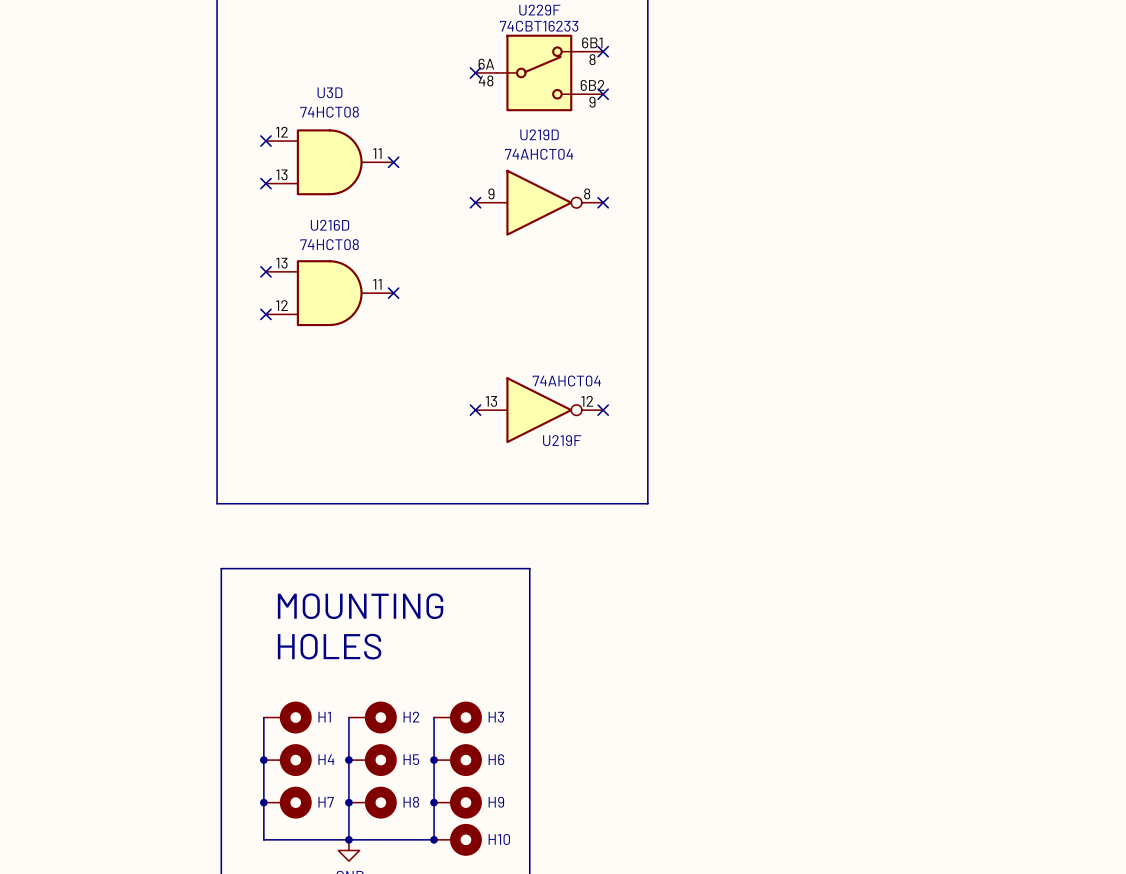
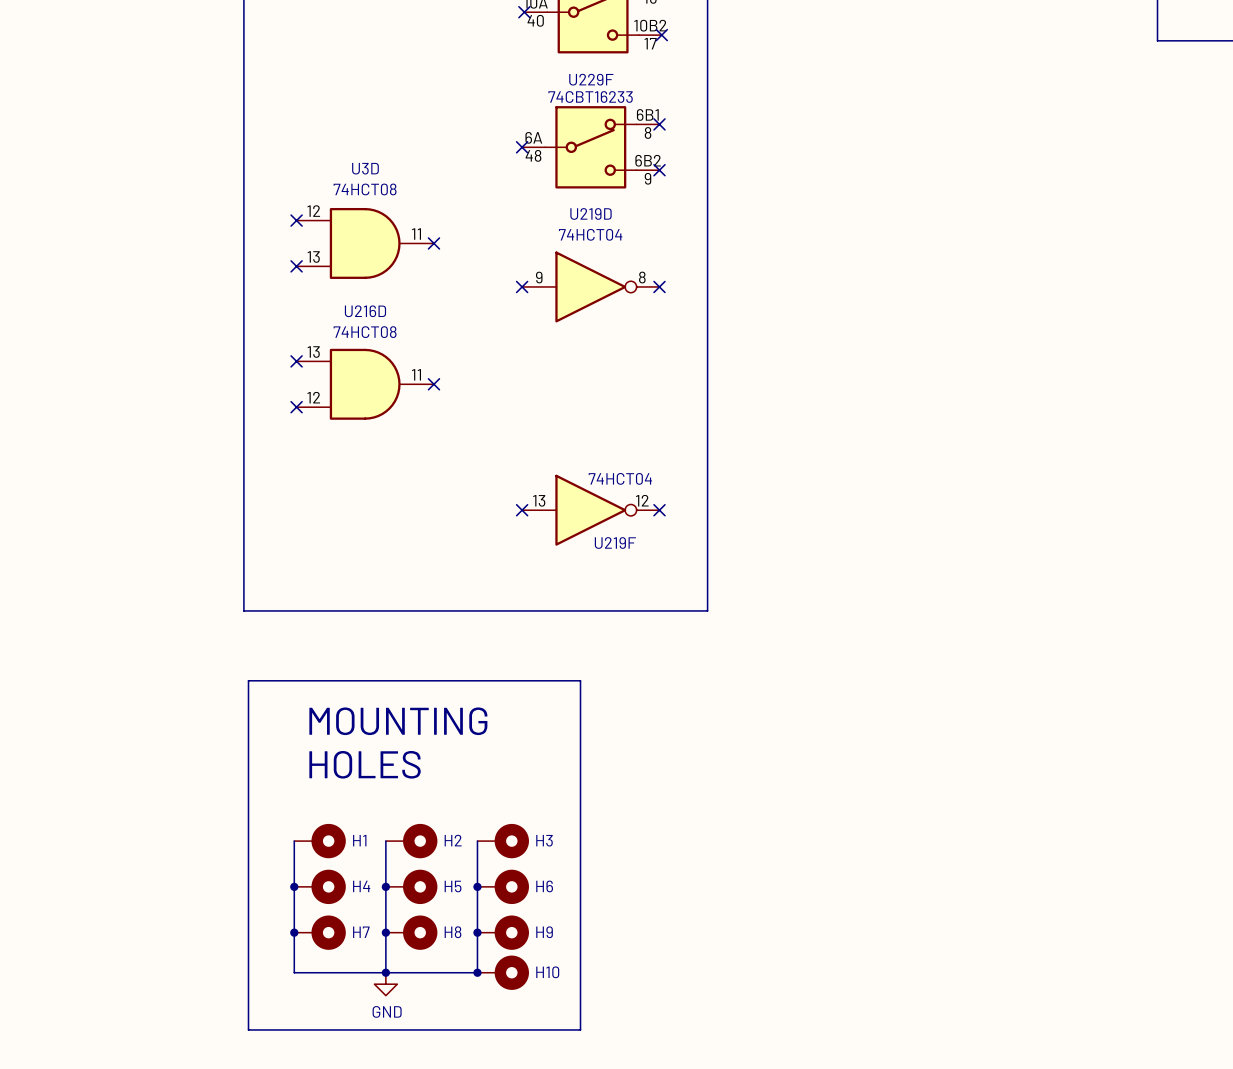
U219D value: 74AHCT04 (539, 154) -> 74HCT04 (590, 234)
U219F value: 74AHCT04 (566, 381) -> 74HCT04 (620, 478)

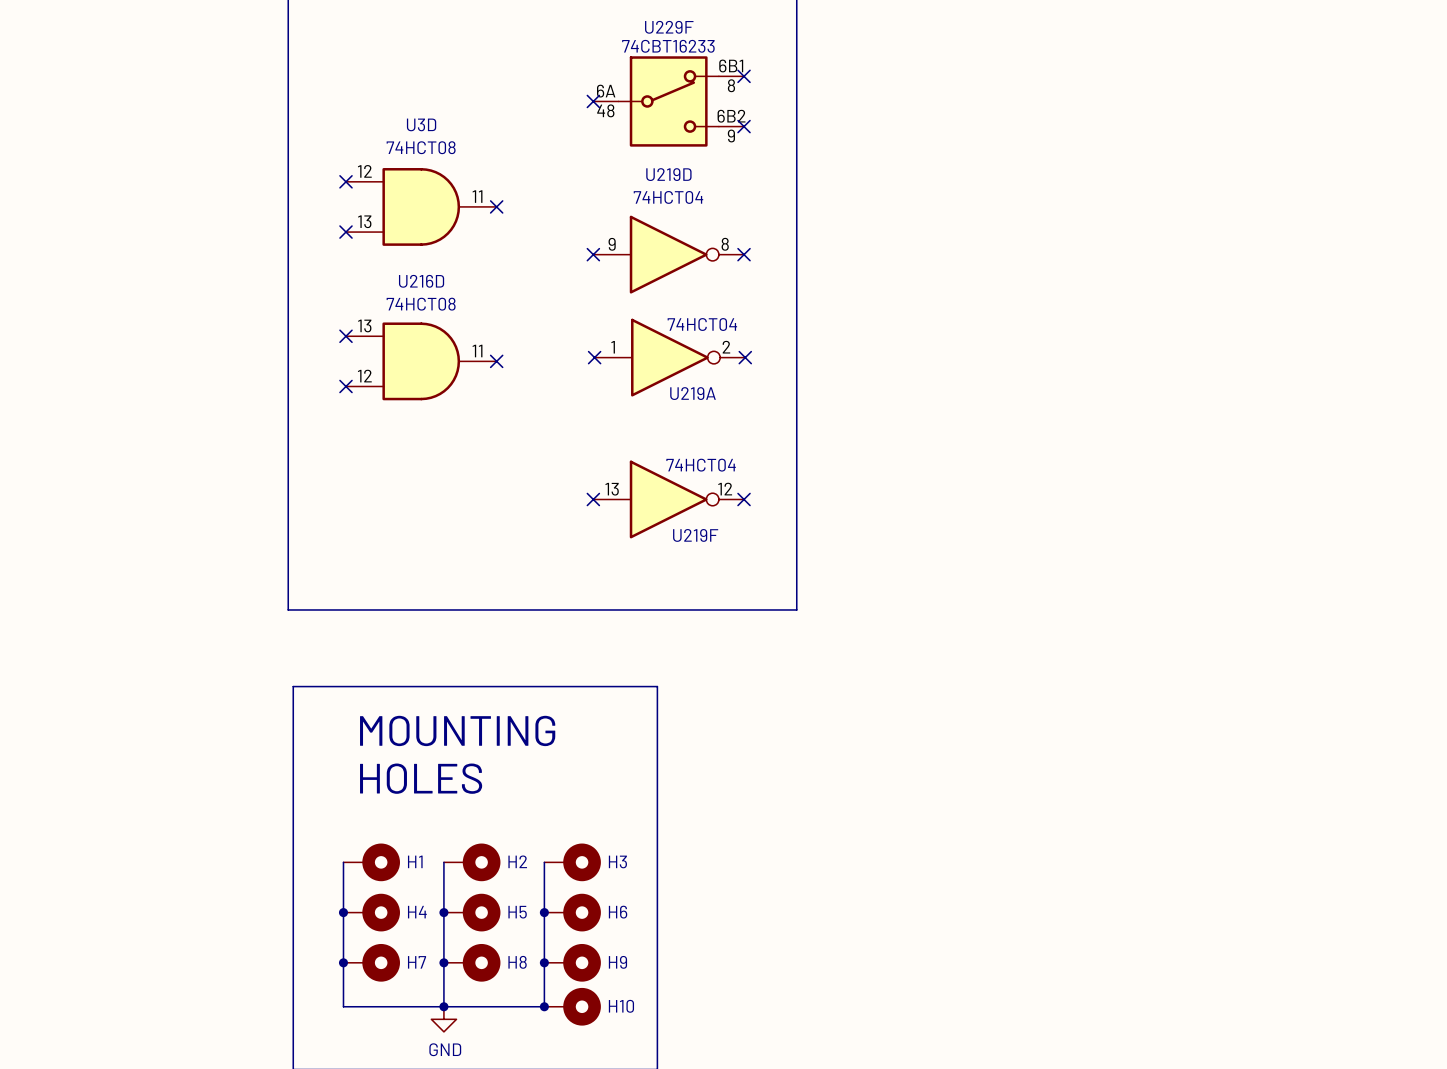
no-connect mark: none -> (594, 357)
U219A: none -> 74HCT04 (669, 357)
no-connect mark: none -> (745, 357)

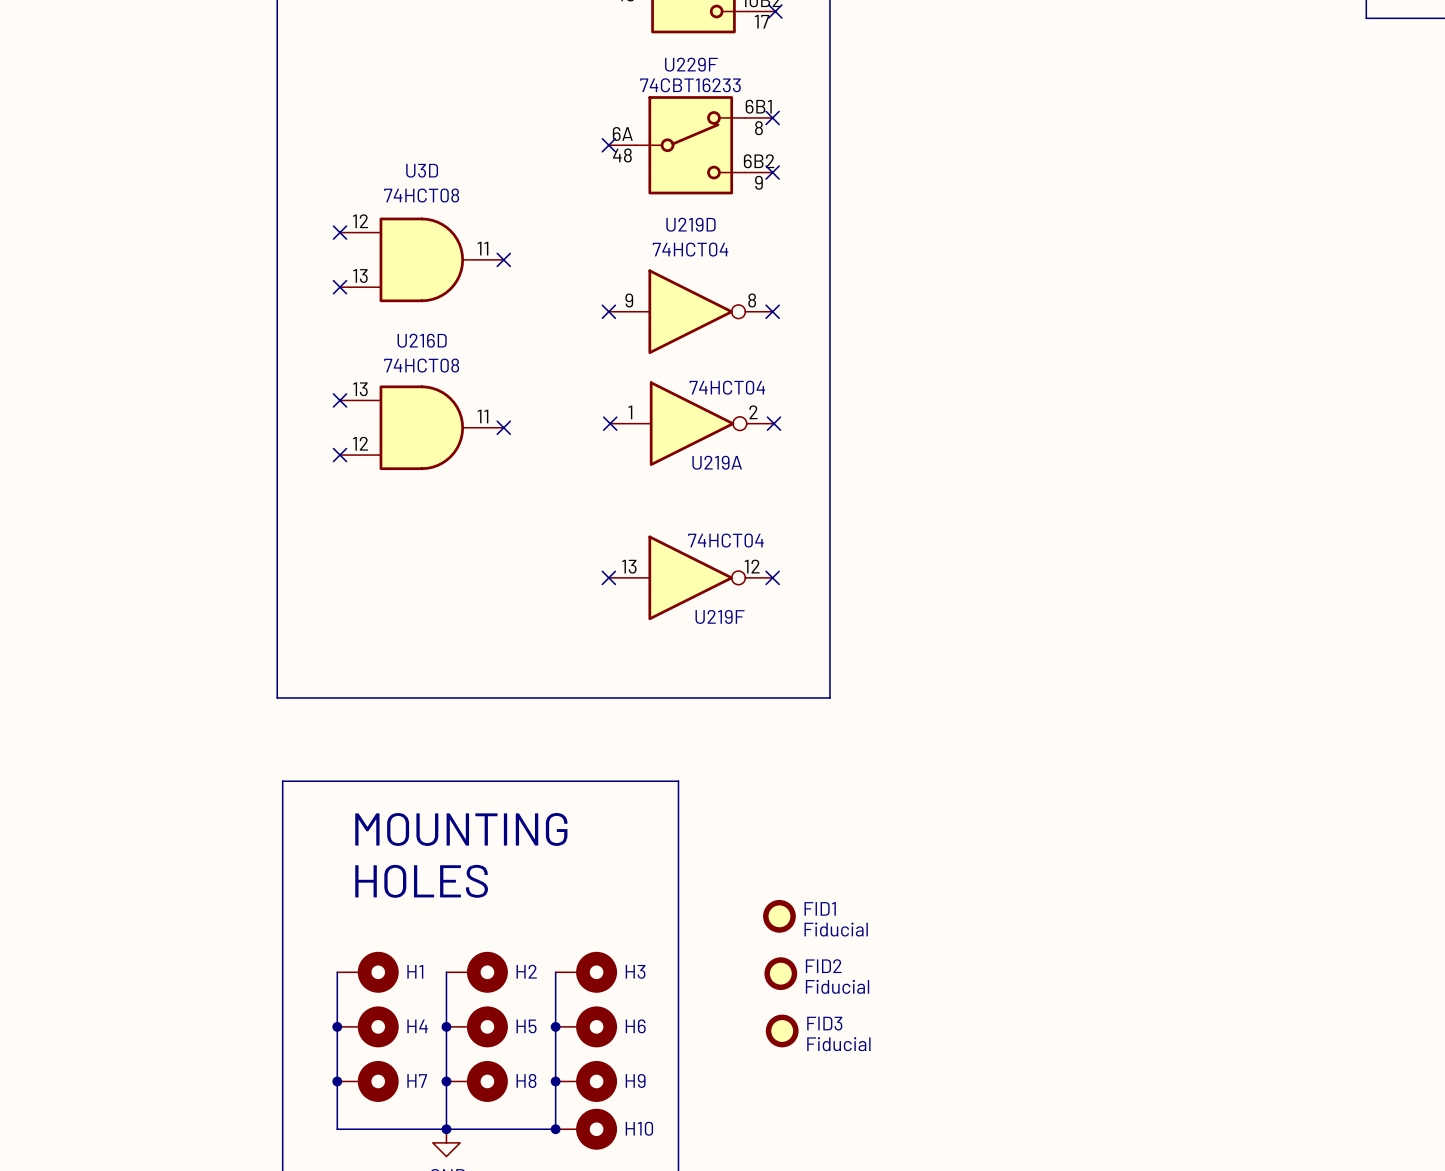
FID1: none -> Fiducial (779, 916)
FID2: none -> Fiducial (780, 973)
FID3: none -> Fiducial (782, 1030)

